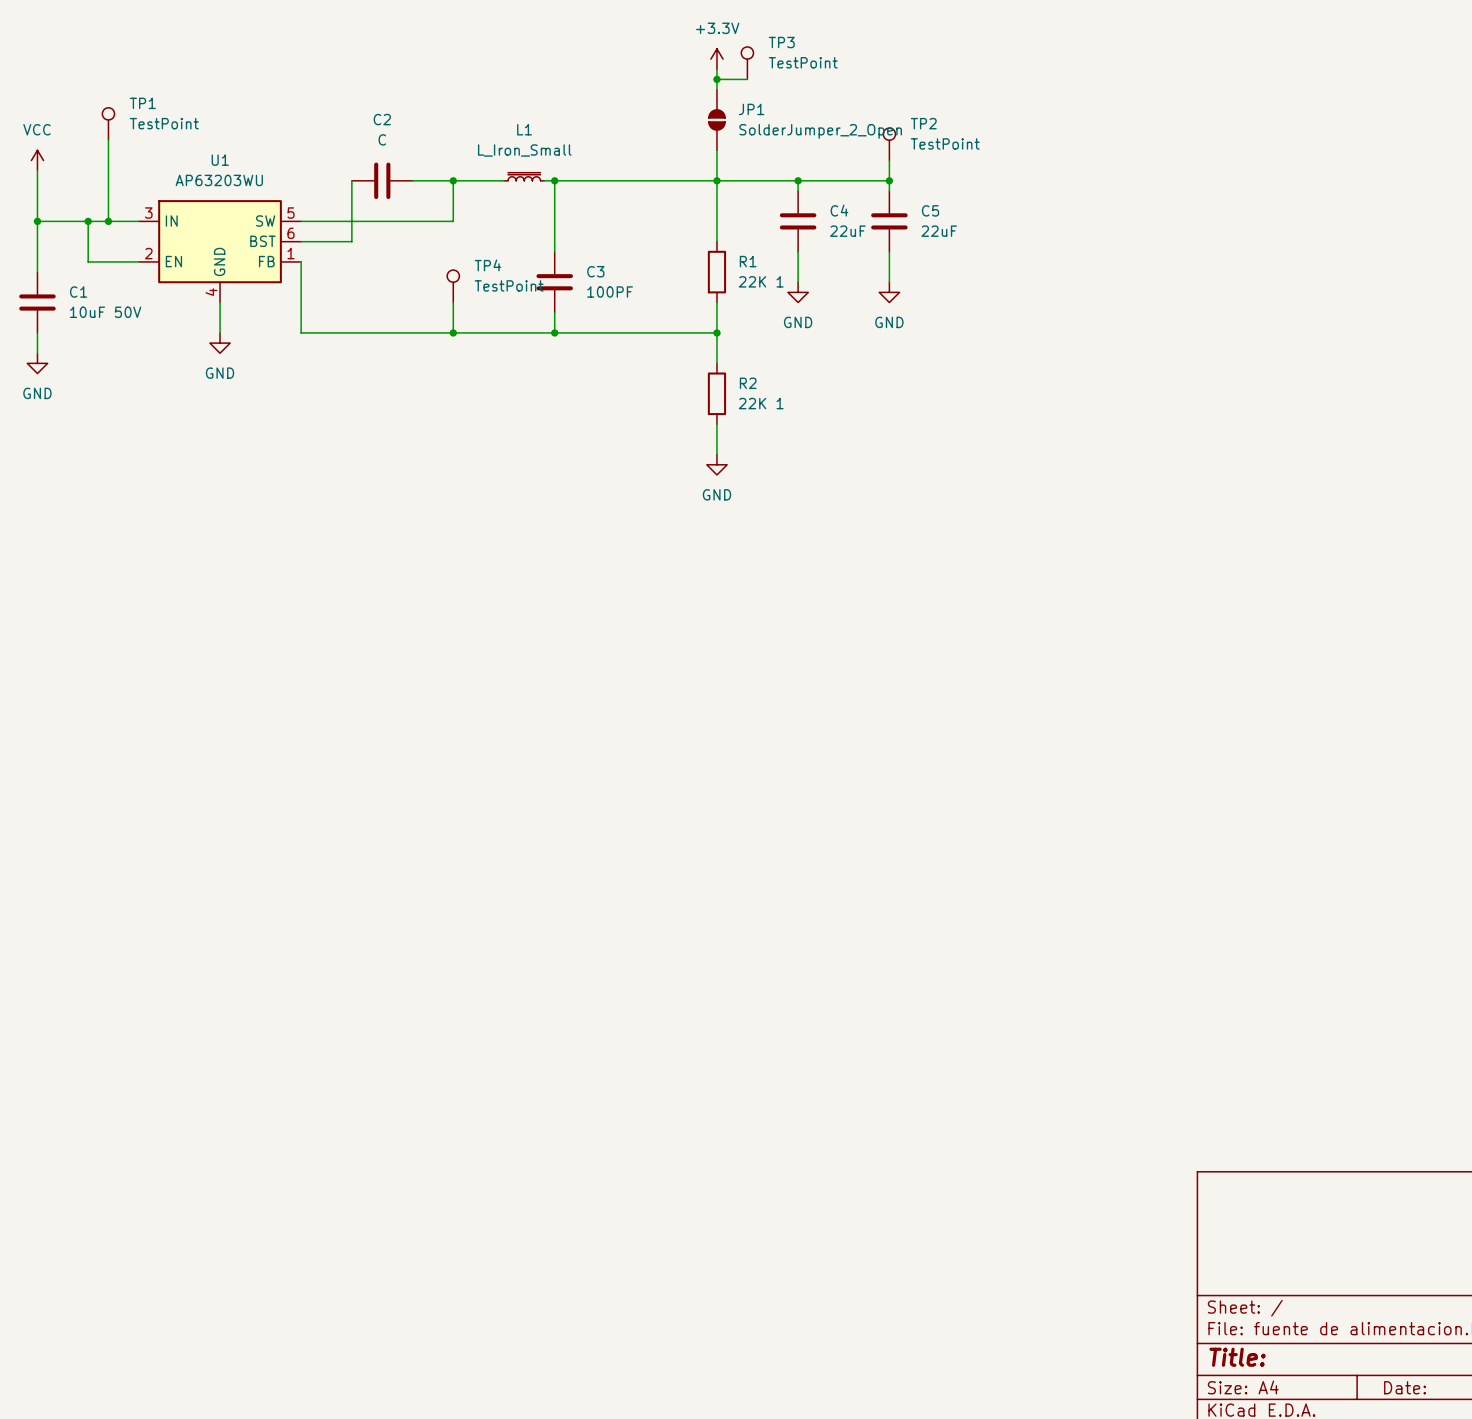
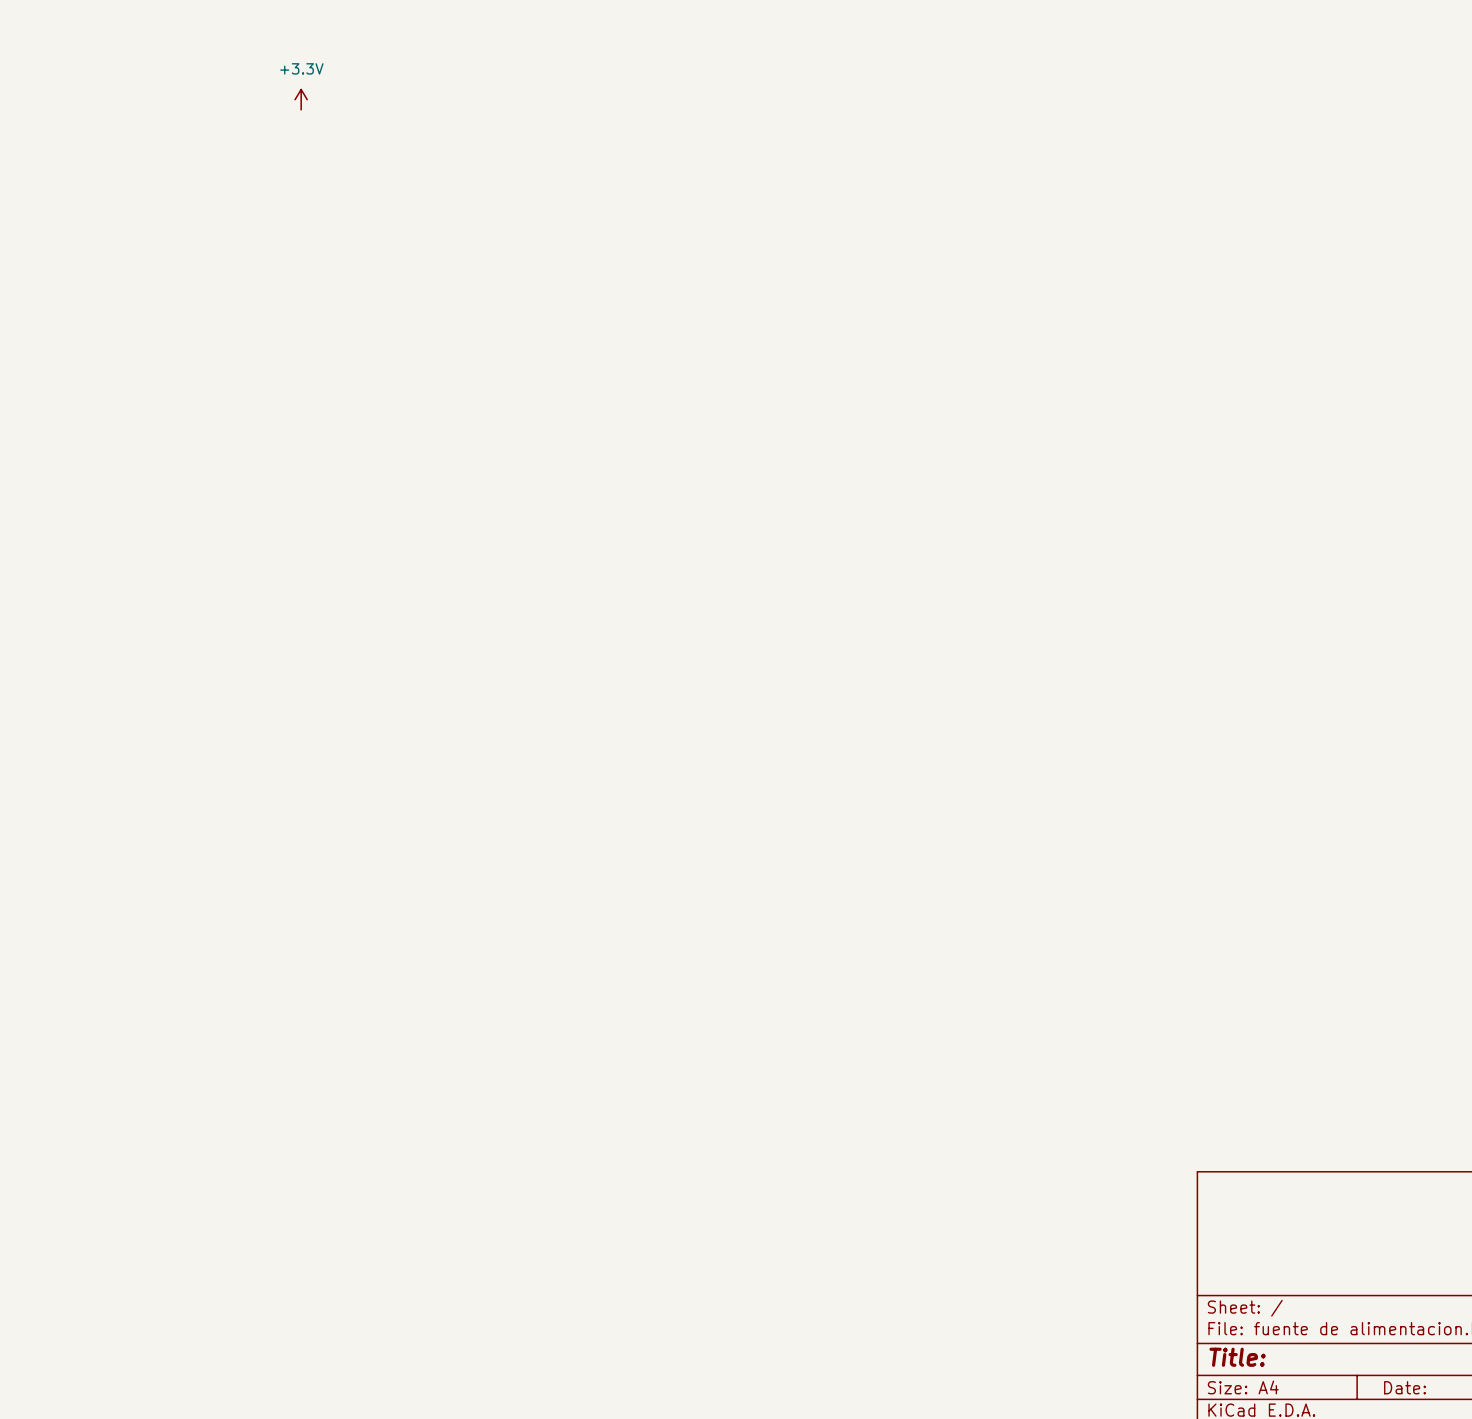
power symbol: +3.3V (716, 59) -> none
TP3: TestPoint (747, 63) -> none
wire: (716, 69) (716, 89) -> none
wire: (716, 79) (747, 79) -> none
junction: (716, 79) -> none
power symbol: none -> +3.3V (301, 99)
JP1: SolderJumper_2_Open (716, 119) -> none
TP1: TestPoint (108, 124) -> none
wire: (108, 140) (108, 221) -> none
TP2: TestPoint (889, 144) -> none
wire: (716, 150) (716, 241) -> none
power symbol: VCC (37, 160) -> none
wire: (889, 160) (889, 190) -> none
wire: (37, 170) (37, 272) -> none
L1: L_Iron_Small (524, 176) -> none
wire: (351, 180) (351, 241) (301, 241) -> none
C2: C (382, 180) -> none
wire: (412, 180) (503, 180) -> none
wire: (453, 180) (453, 221) (301, 221) -> none
junction: (453, 180) -> none
wire: (544, 180) (889, 180) -> none
wire: (554, 180) (554, 251) -> none
junction: (554, 180) -> none
junction: (716, 180) -> none
wire: (798, 180) (798, 190) -> none
junction: (798, 180) -> none
junction: (889, 180) -> none
wire: (37, 221) (138, 221) -> none
junction: (37, 221) -> none
wire: (88, 221) (88, 261) (138, 261) -> none
junction: (88, 221) -> none
junction: (108, 221) -> none
C4: 22uF (798, 221) -> none
C5: 22uF (889, 221) -> none
U1: AP63203WU (220, 251) -> none
wire: (798, 251) (798, 282) -> none
wire: (889, 251) (889, 282) -> none
wire: (301, 261) (301, 332) (716, 332) -> none
R1: 22K 1 (716, 272) -> none
C3: 100PF (554, 282) -> none
TP4: TestPoint (453, 286) -> none
power symbol: GND (798, 292) -> none
power symbol: GND (889, 292) -> none
C1: 10uF 50V (37, 302) -> none
wire: (220, 302) (220, 332) -> none
wire: (453, 302) (453, 332) -> none
wire: (716, 302) (716, 363) -> none
wire: (554, 312) (554, 332) -> none
wire: (37, 332) (37, 353) -> none
junction: (453, 332) -> none
junction: (554, 332) -> none
junction: (716, 332) -> none
power symbol: GND (220, 343) -> none
power symbol: GND (37, 363) -> none
R2: 22K 1 (716, 393) -> none
wire: (716, 424) (716, 454) -> none
power symbol: GND (716, 464) -> none

